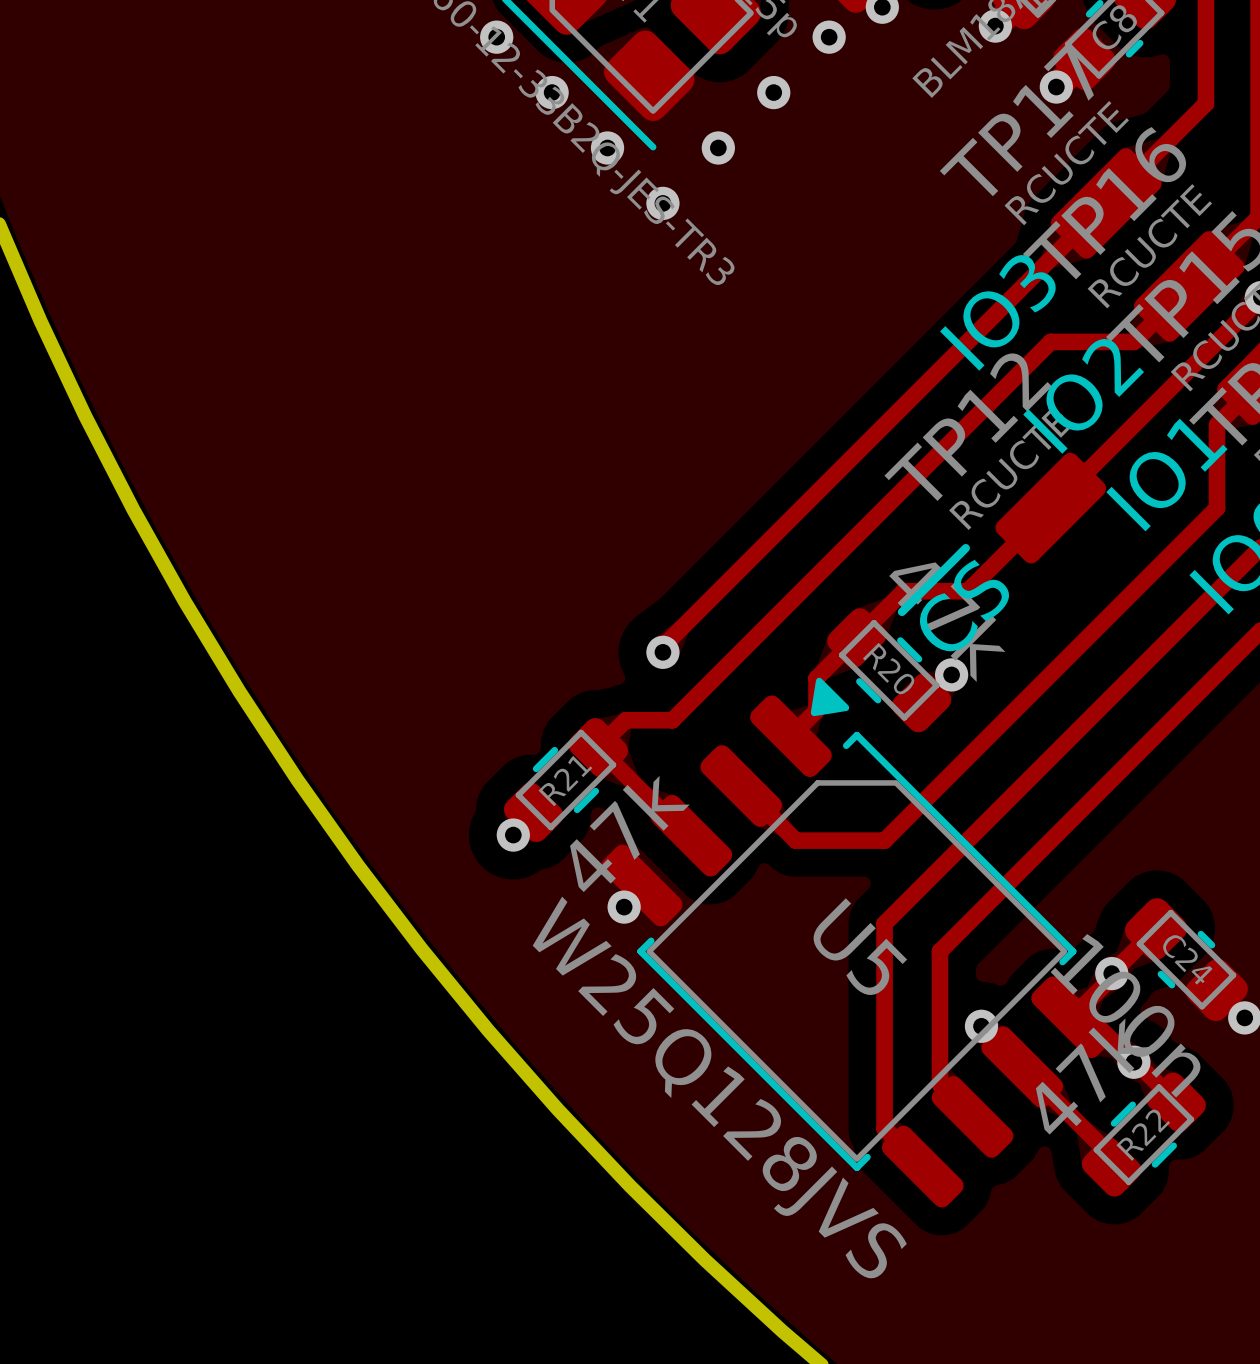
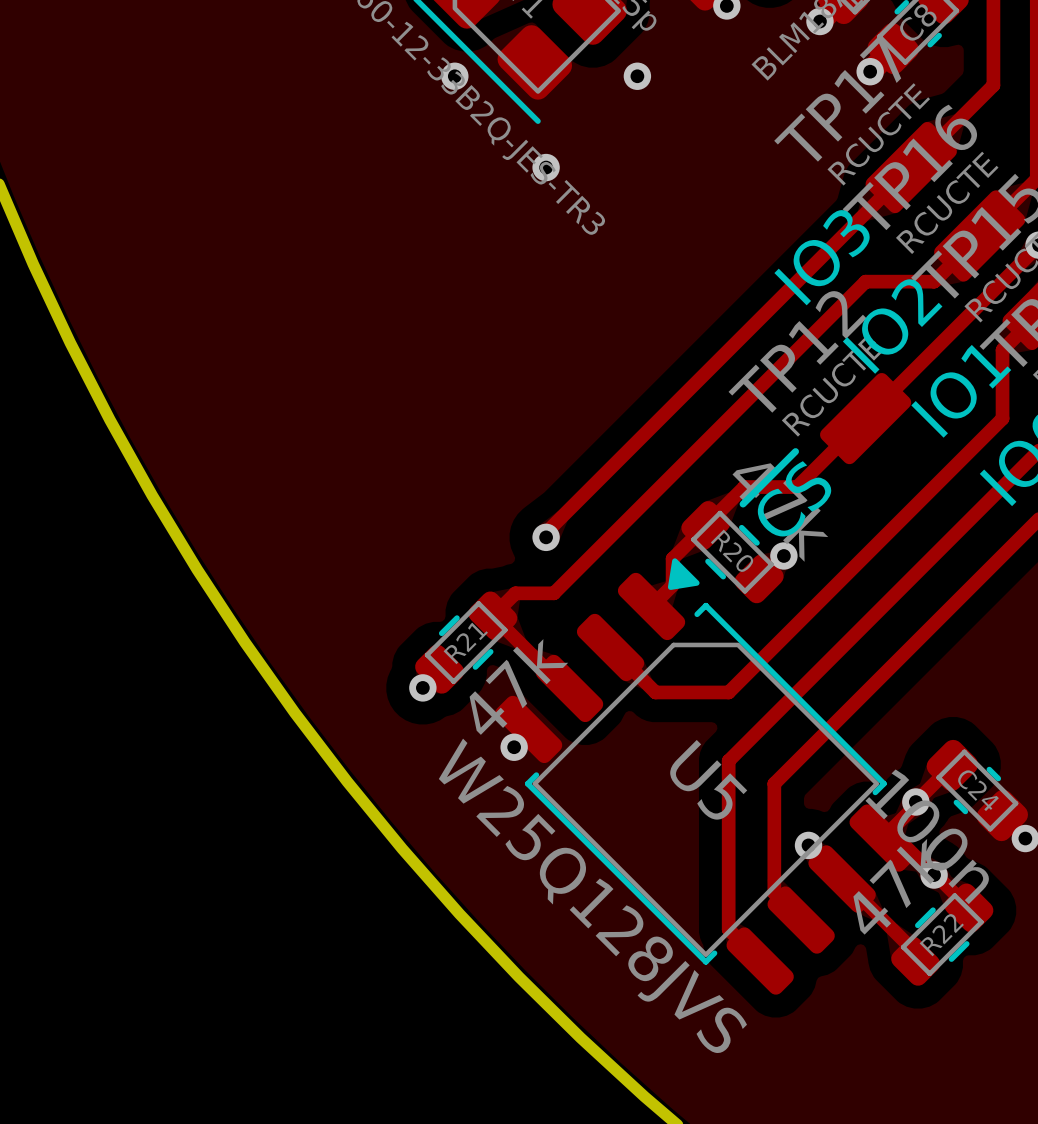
via: (496, 37) -> none
via: (829, 37) -> none
via: (607, 147) -> none
via: (718, 147) -> none

